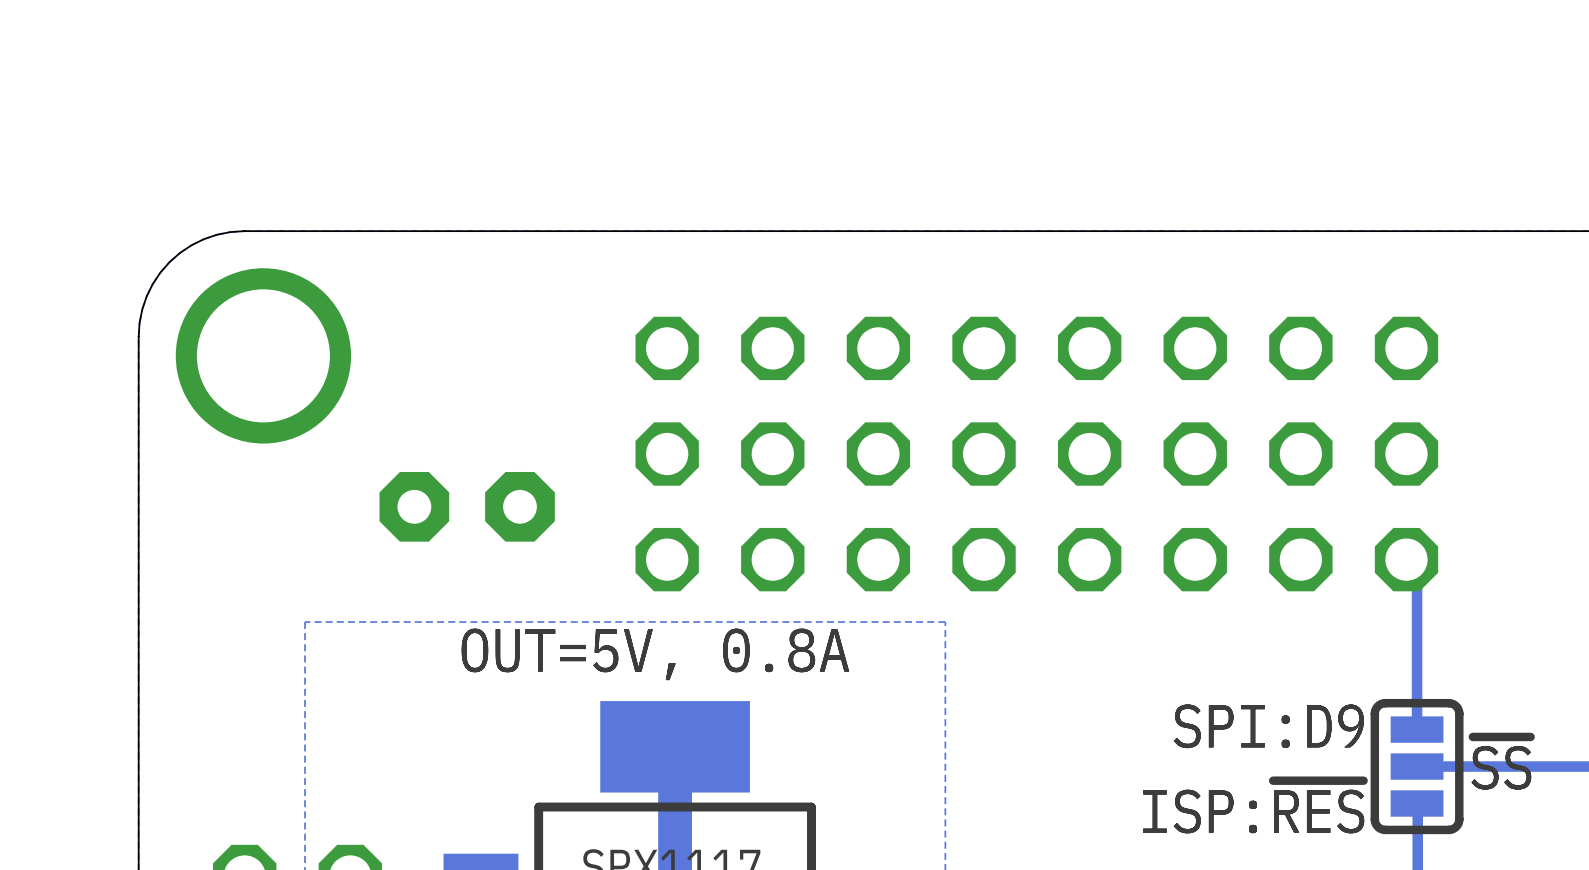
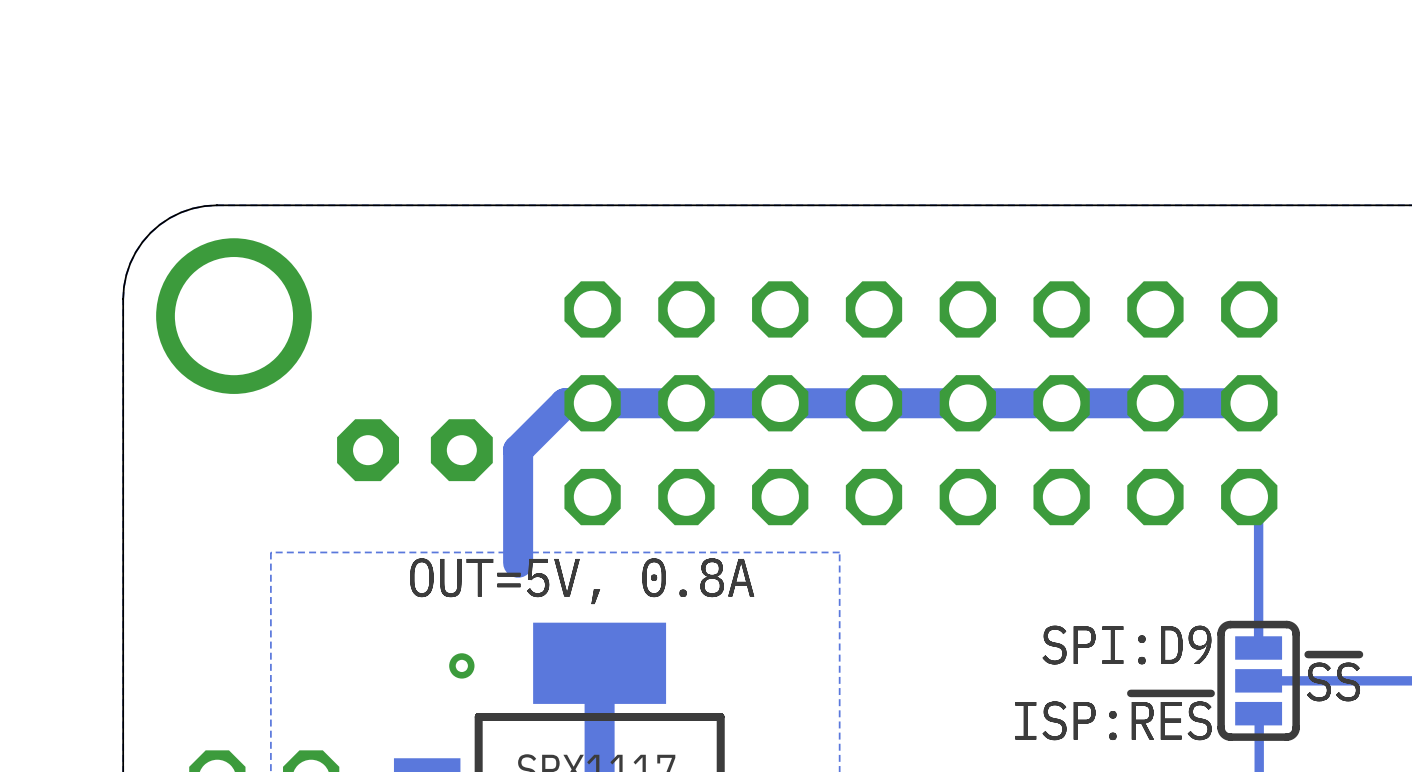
track: none -> (1249, 403) (565, 403) (518, 450) (518, 562)
via: none -> (461, 665)

